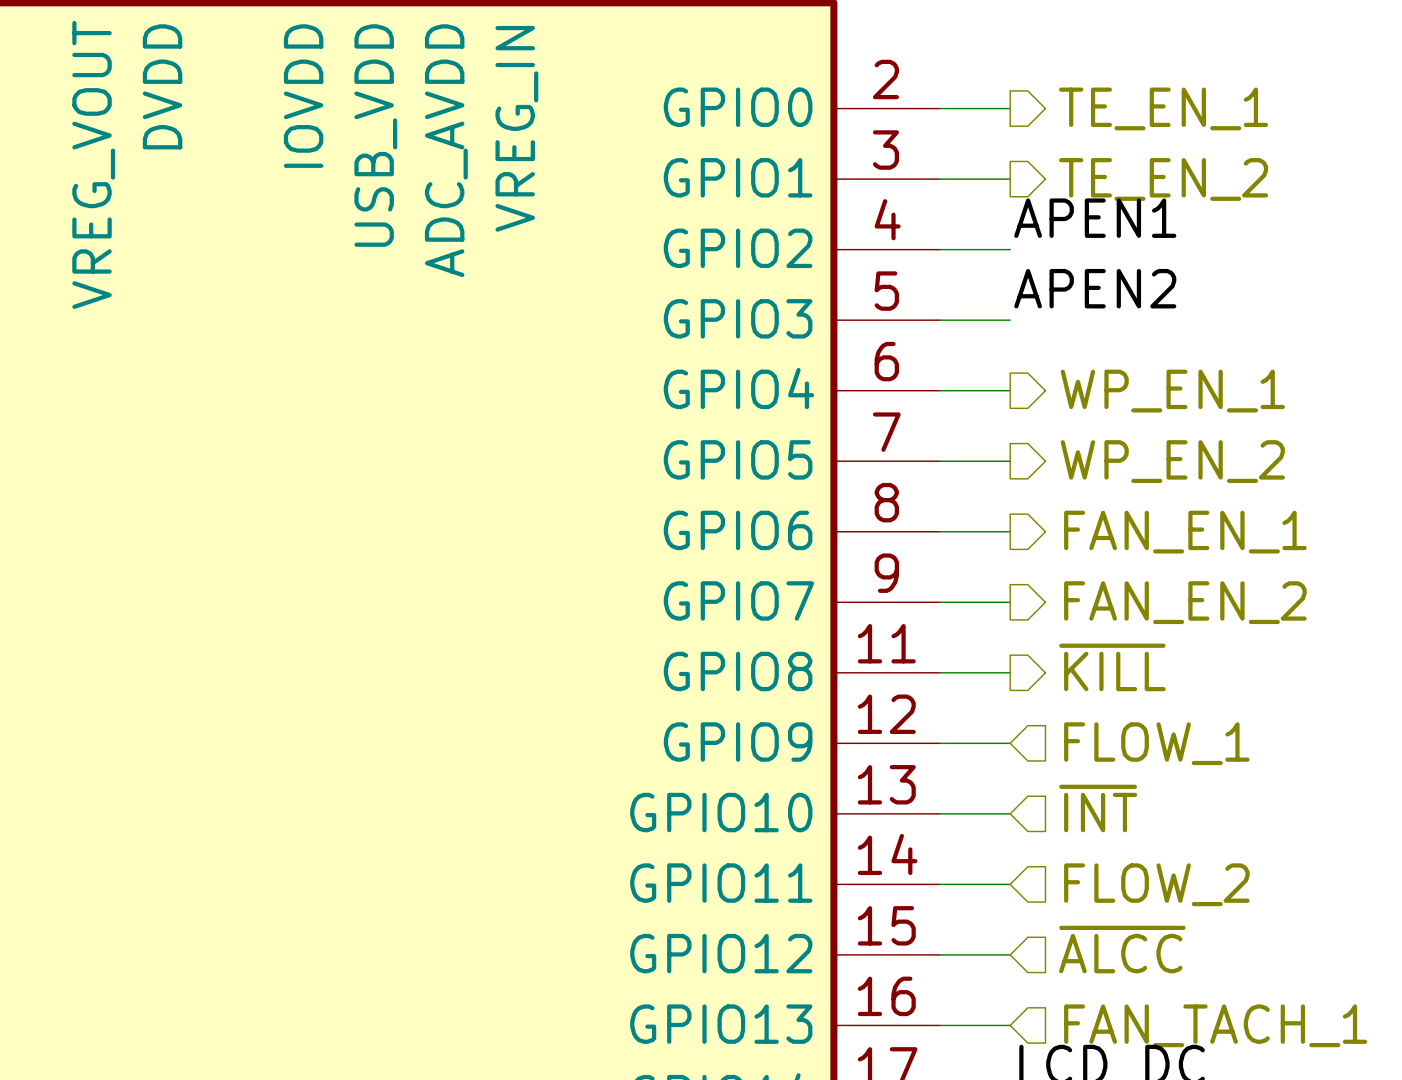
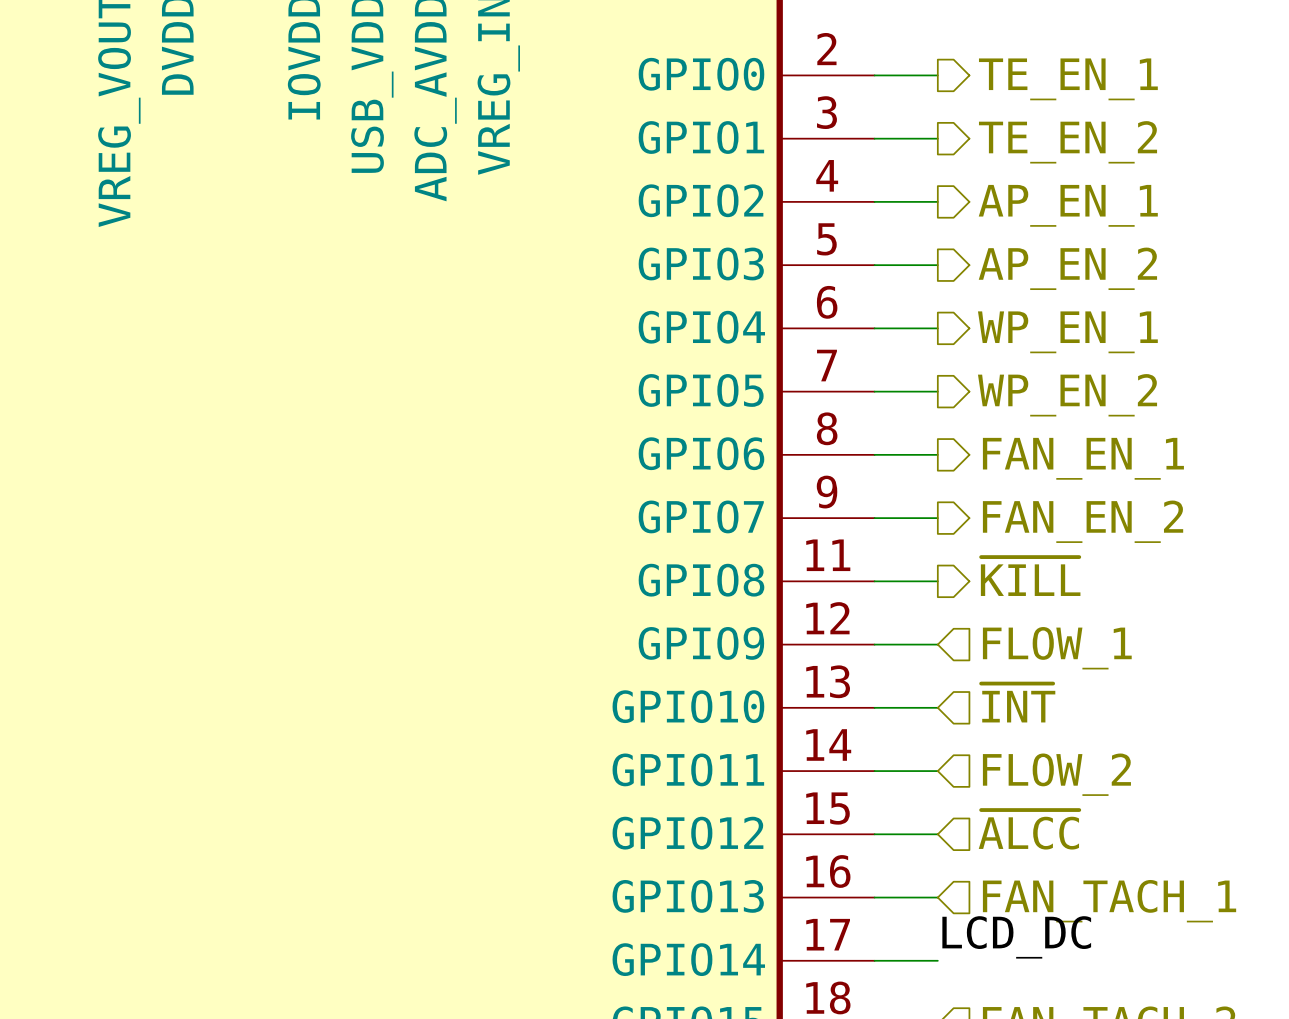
label: APEN1 (1095, 218) -> none
hierarchical label: none -> AP_EN_1 (1068, 205)
label: APEN2 (1095, 288) -> none
hierarchical label: none -> AP_EN_2 (1067, 268)

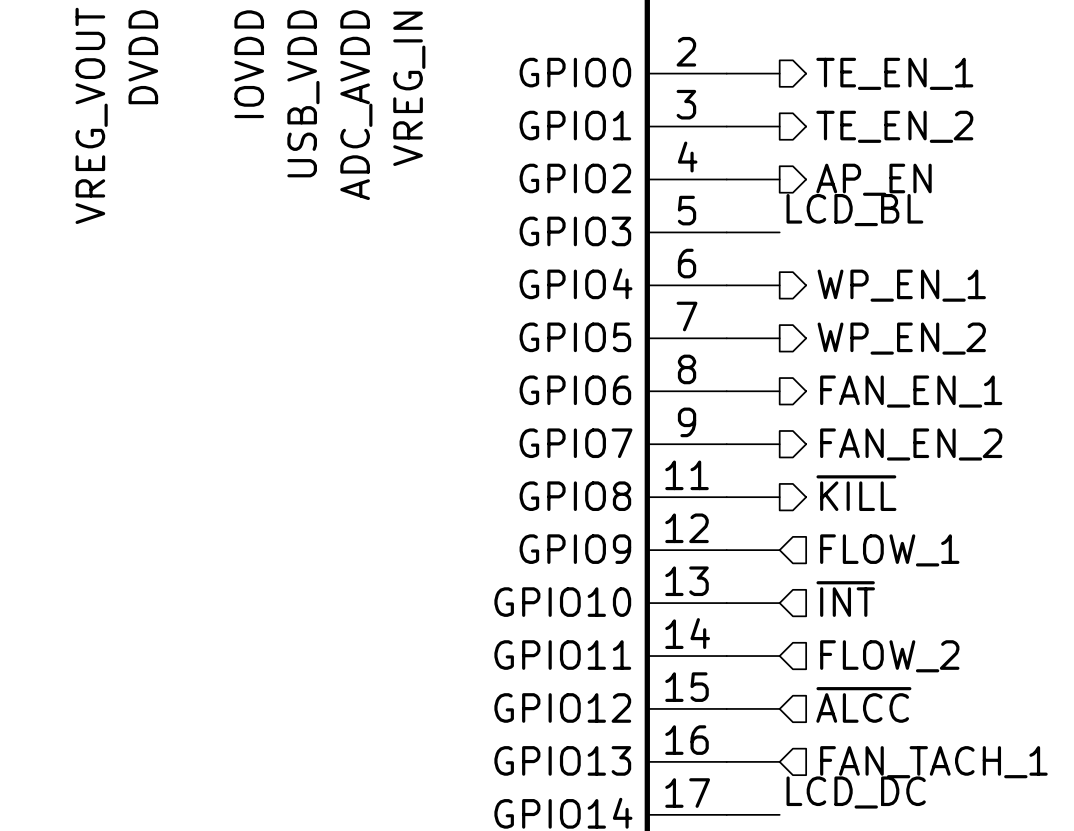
hierarchical label: AP_EN_1 (1068, 205) -> AP_EN (874, 179)
label: none -> LCD_BL (854, 210)
hierarchical label: AP_EN_2 (1067, 268) -> none

